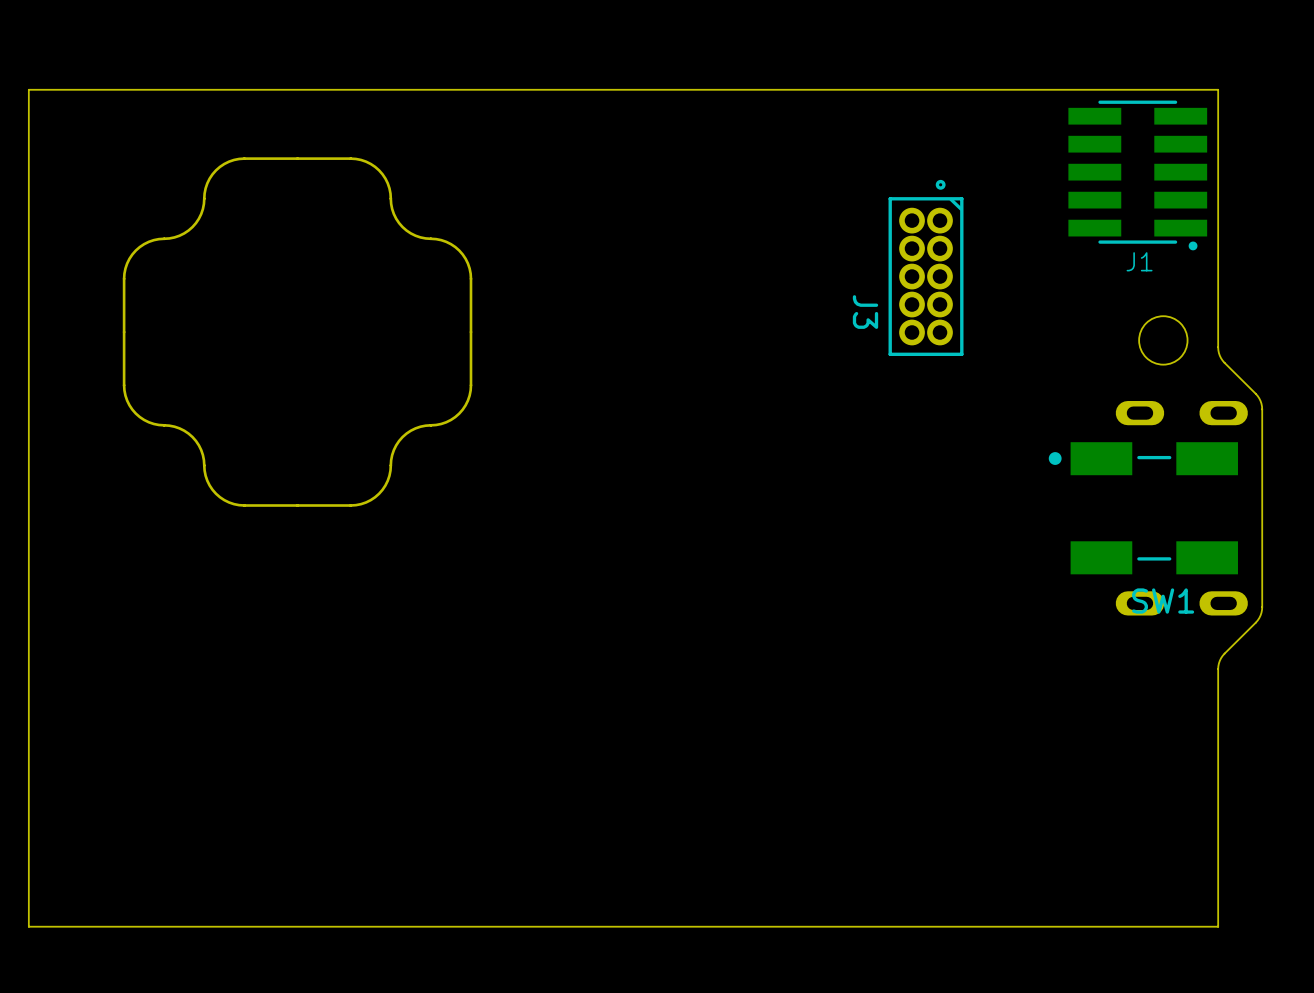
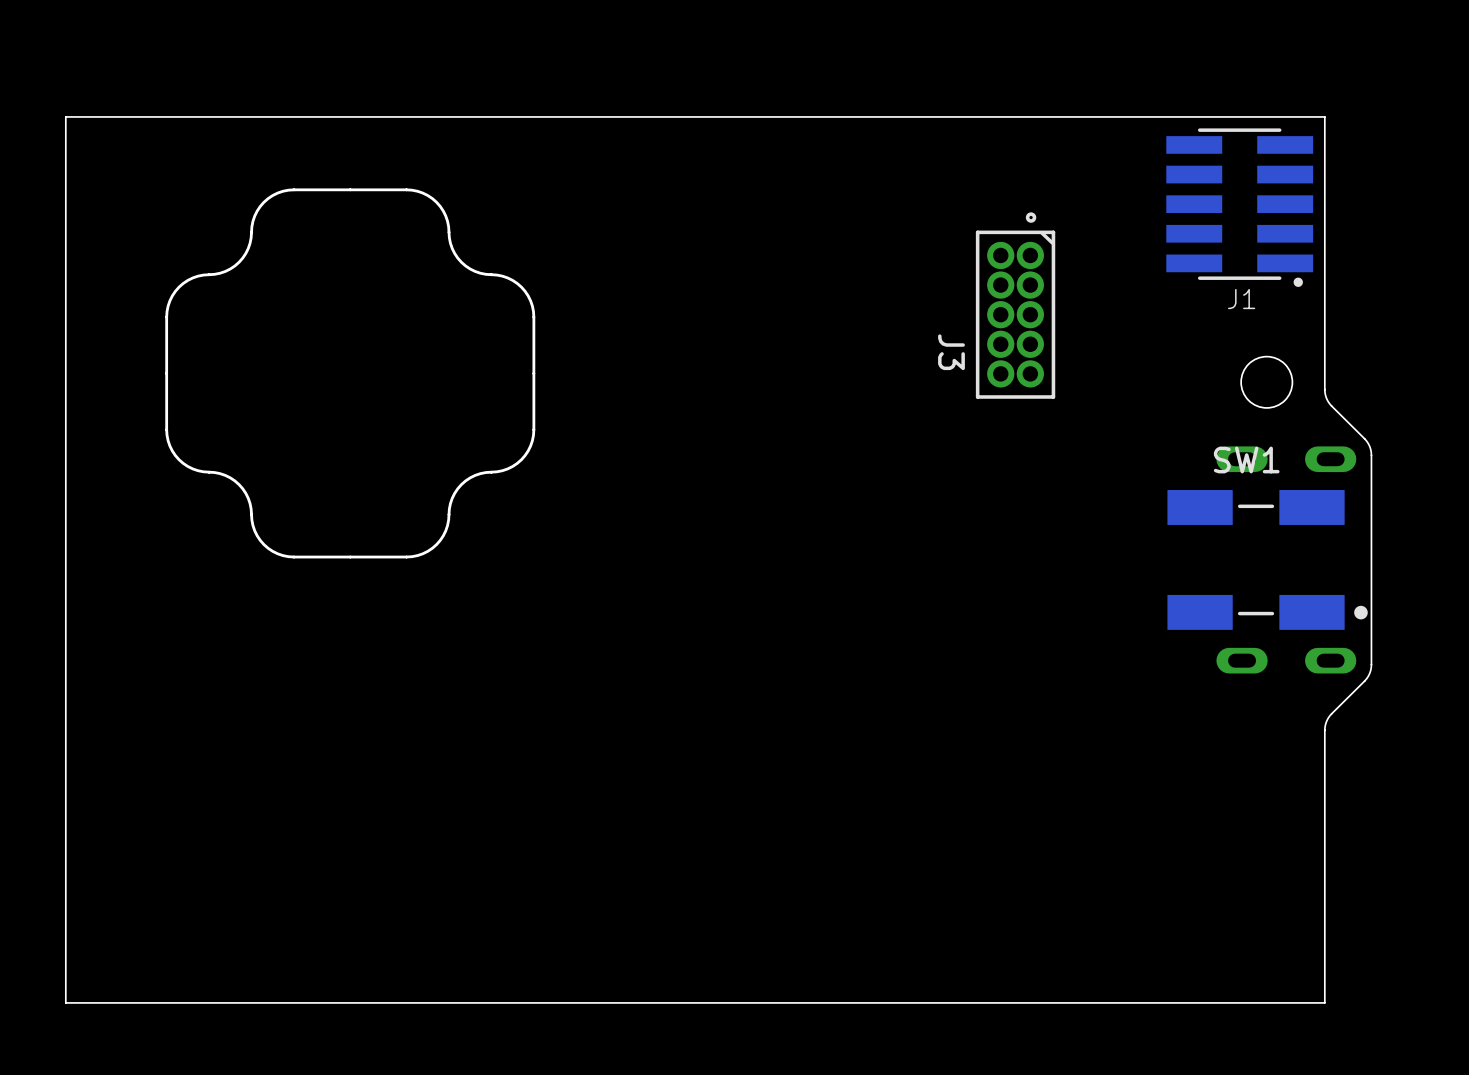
SW1 rotation: 0° (1143, 508) -> 180° (1267, 559)

